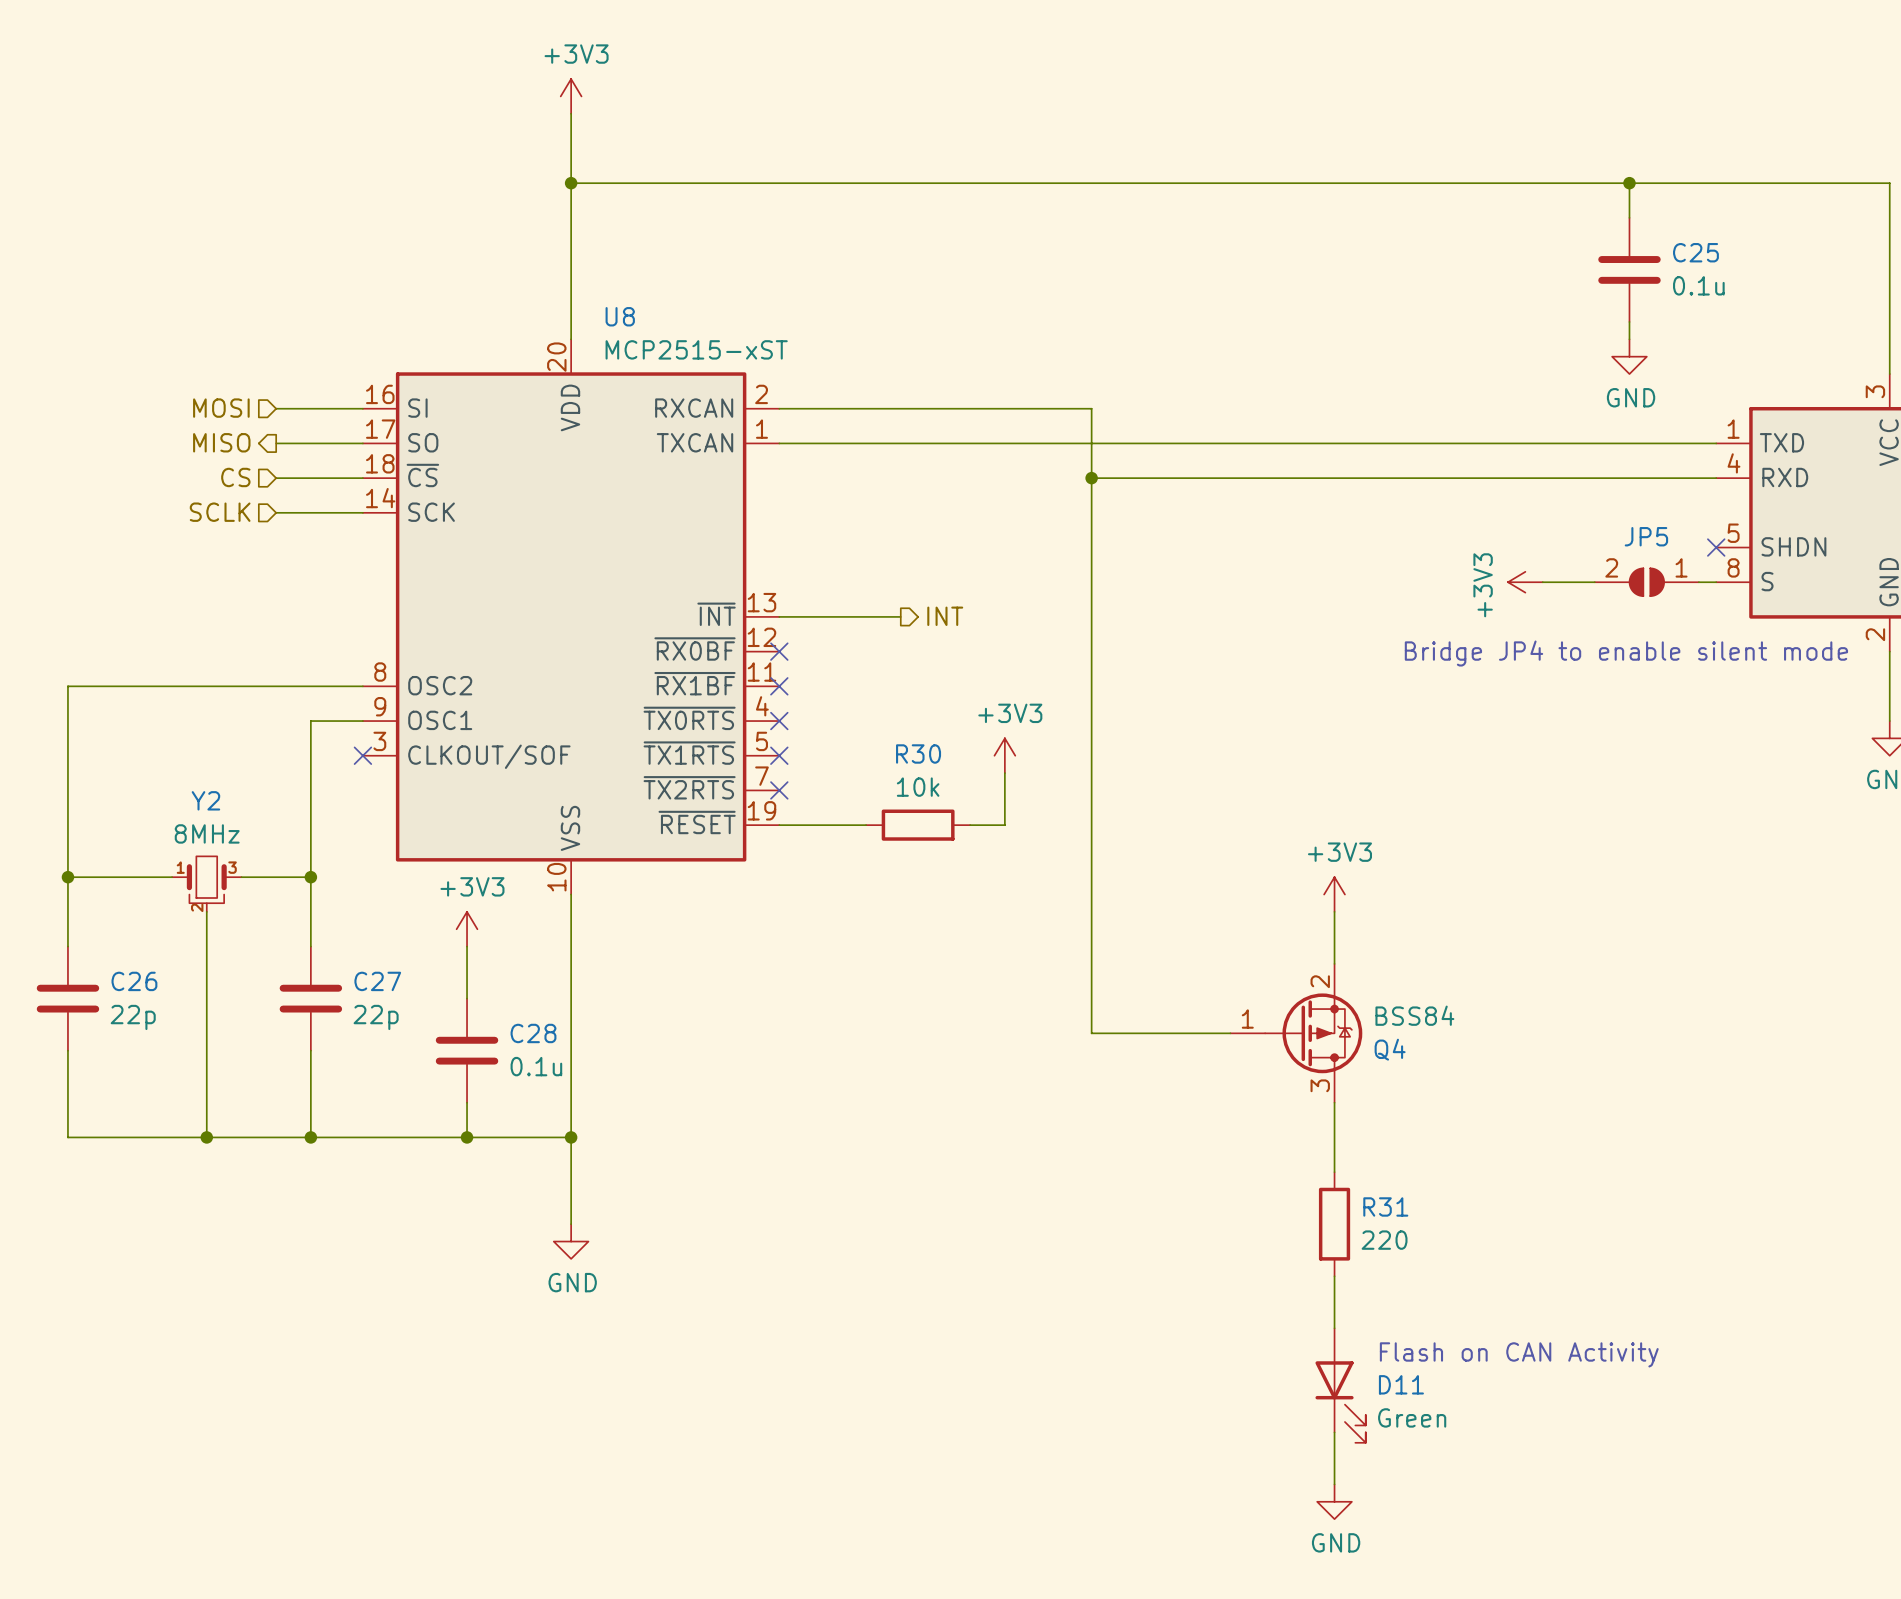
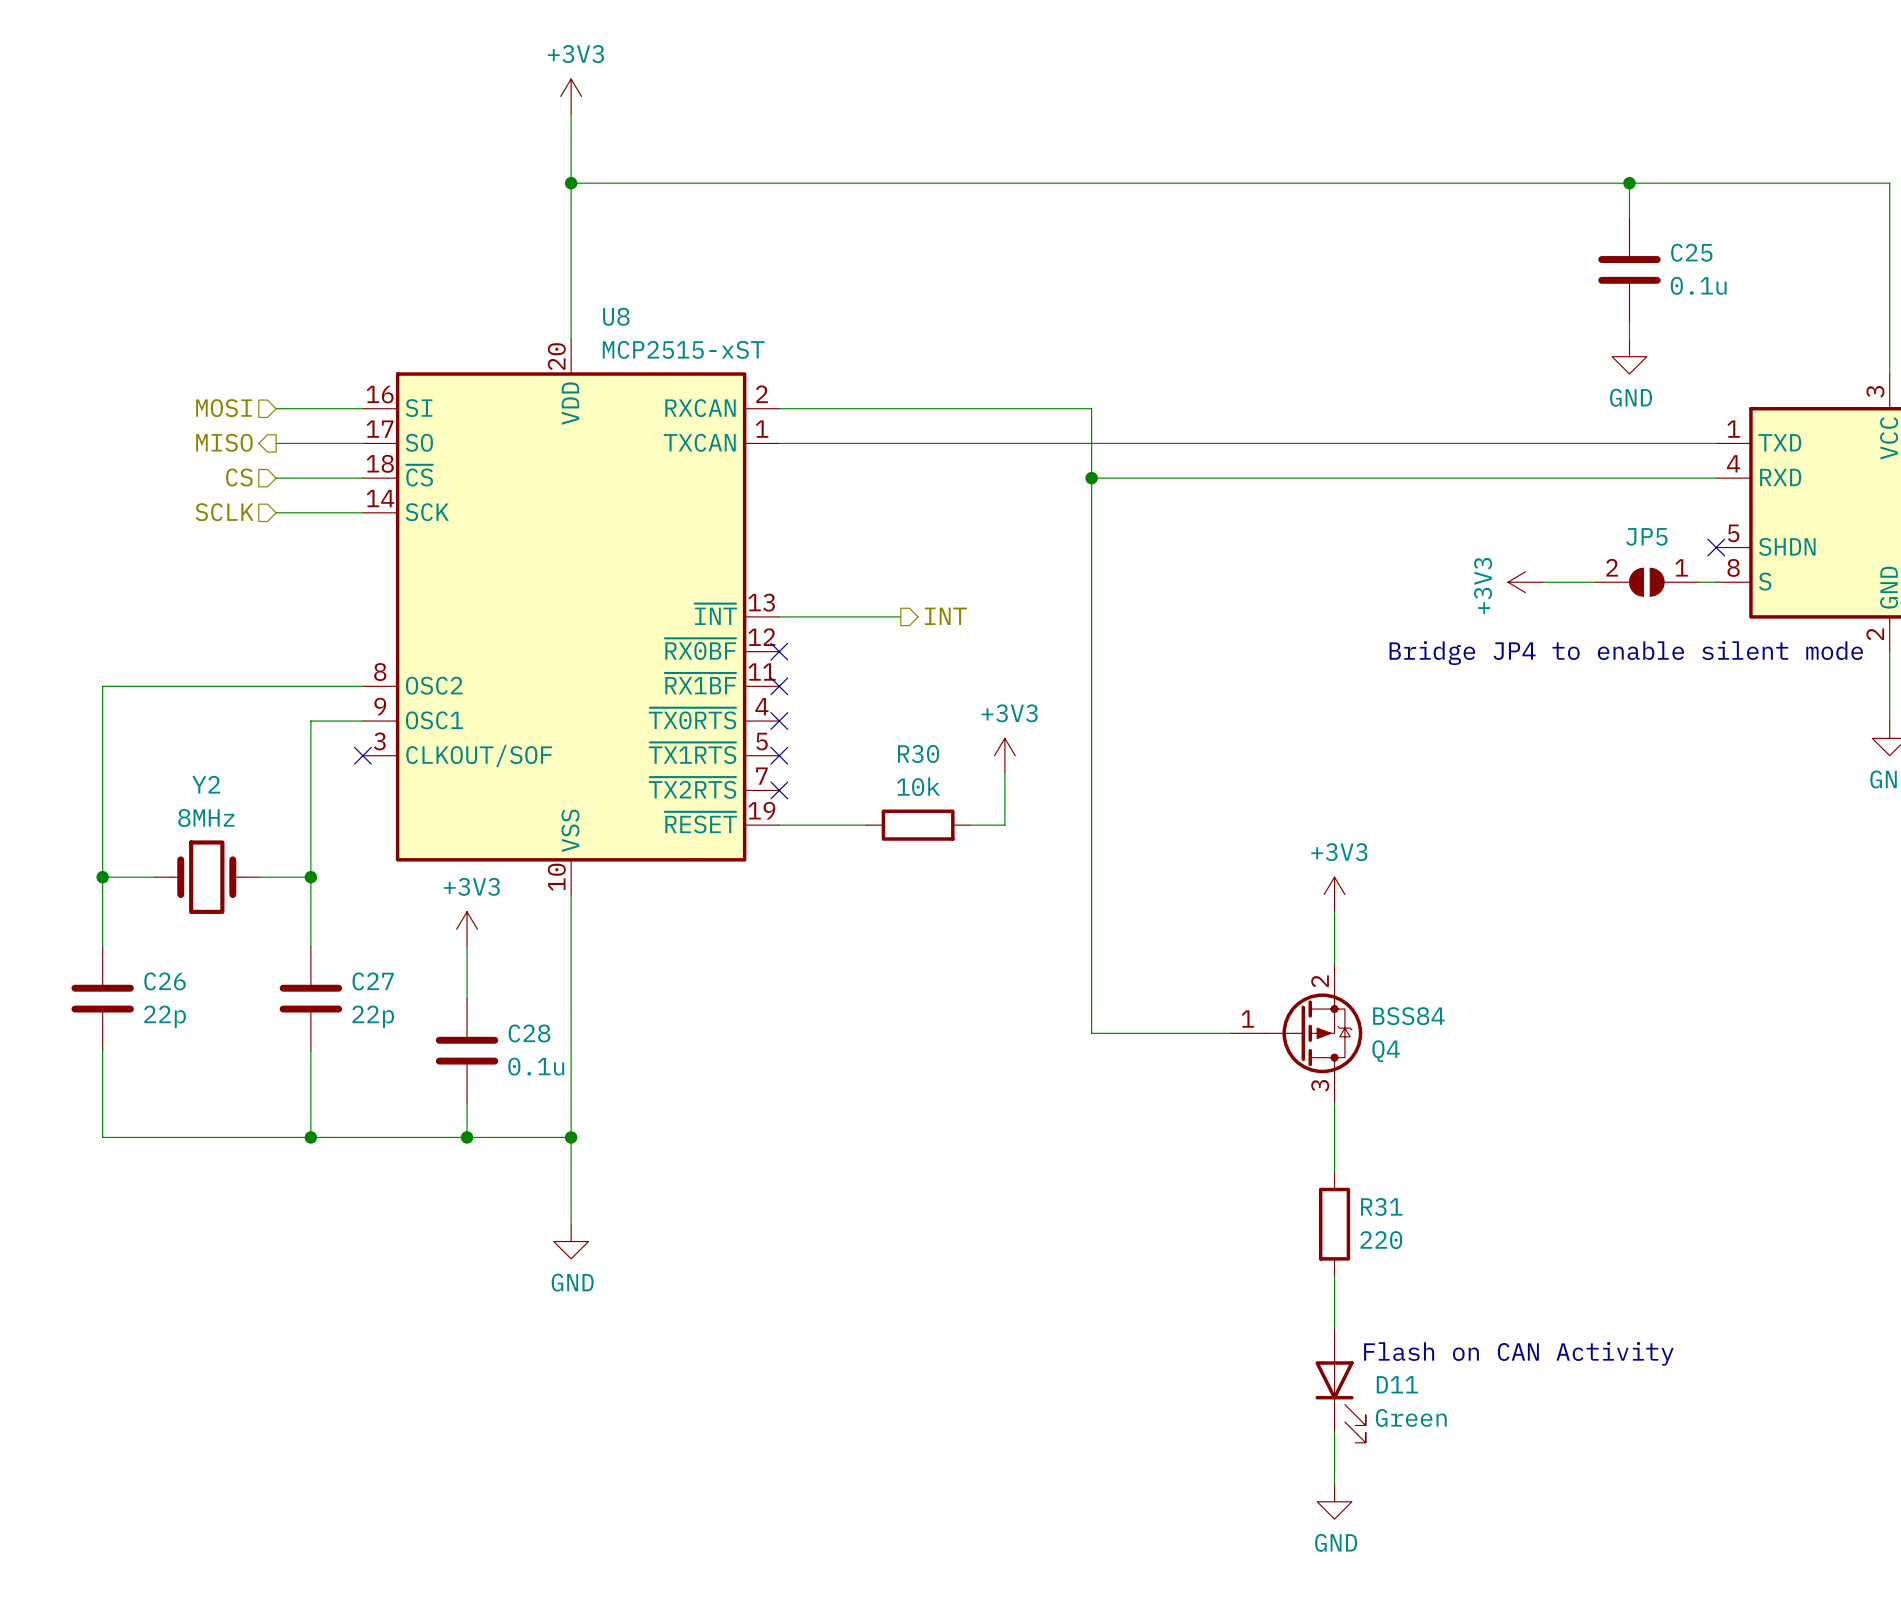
wire: (102, 686) (67, 686) (67, 946) -> (102, 686) (102, 946)
Y2 symbol: [172, 856, 242, 912] -> [154, 840, 259, 914]
wire: (67, 877) (102, 877) -> none
junction position: (67, 877) -> (102, 877)
wire: (206, 911) (206, 1137) -> none
C26 position: (67, 998) -> (102, 998)
wire: (67, 1050) (67, 1137) (102, 1137) -> (102, 1050) (102, 1137)
junction: (206, 1137) -> none

